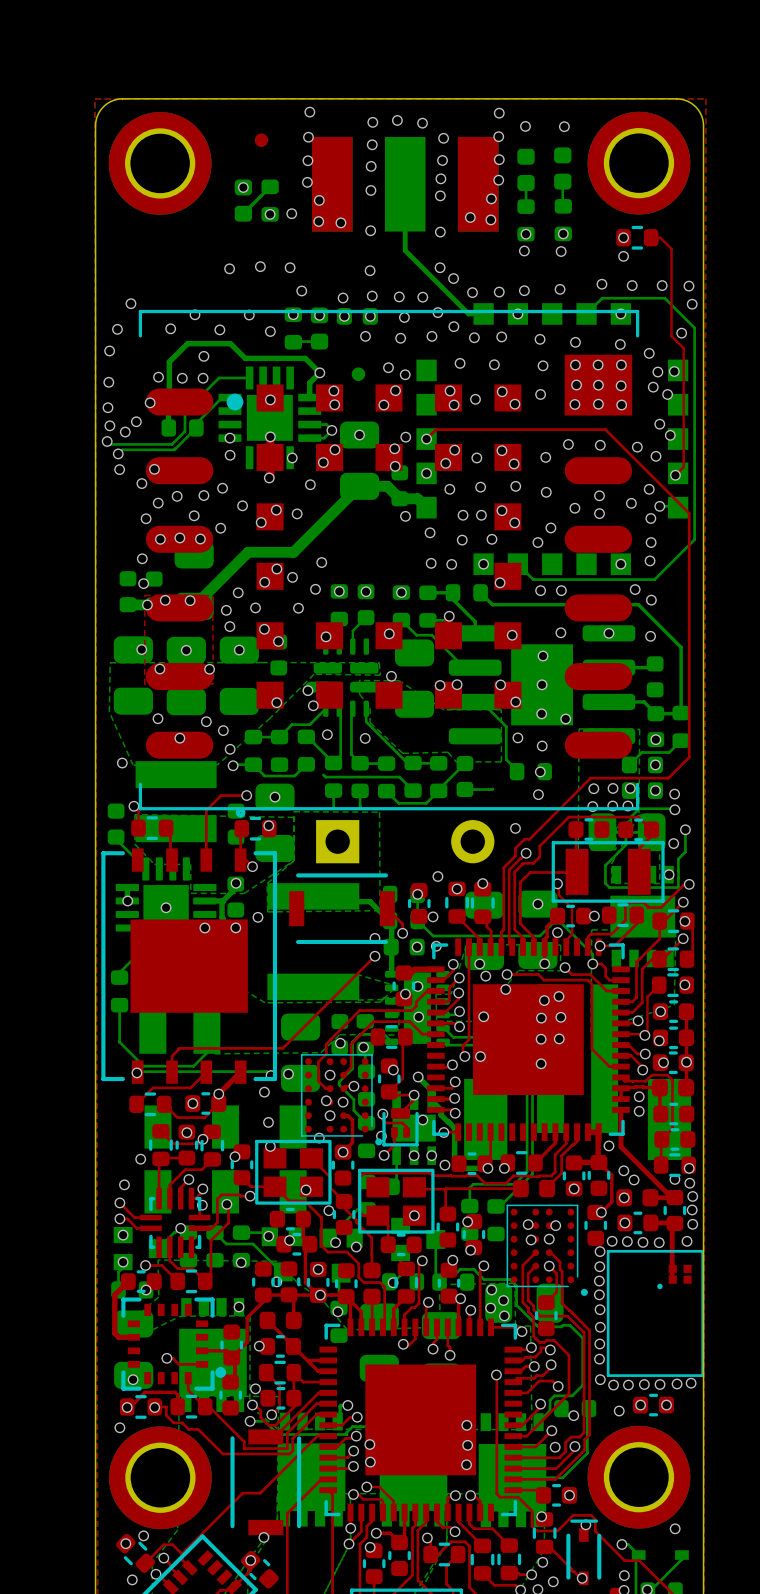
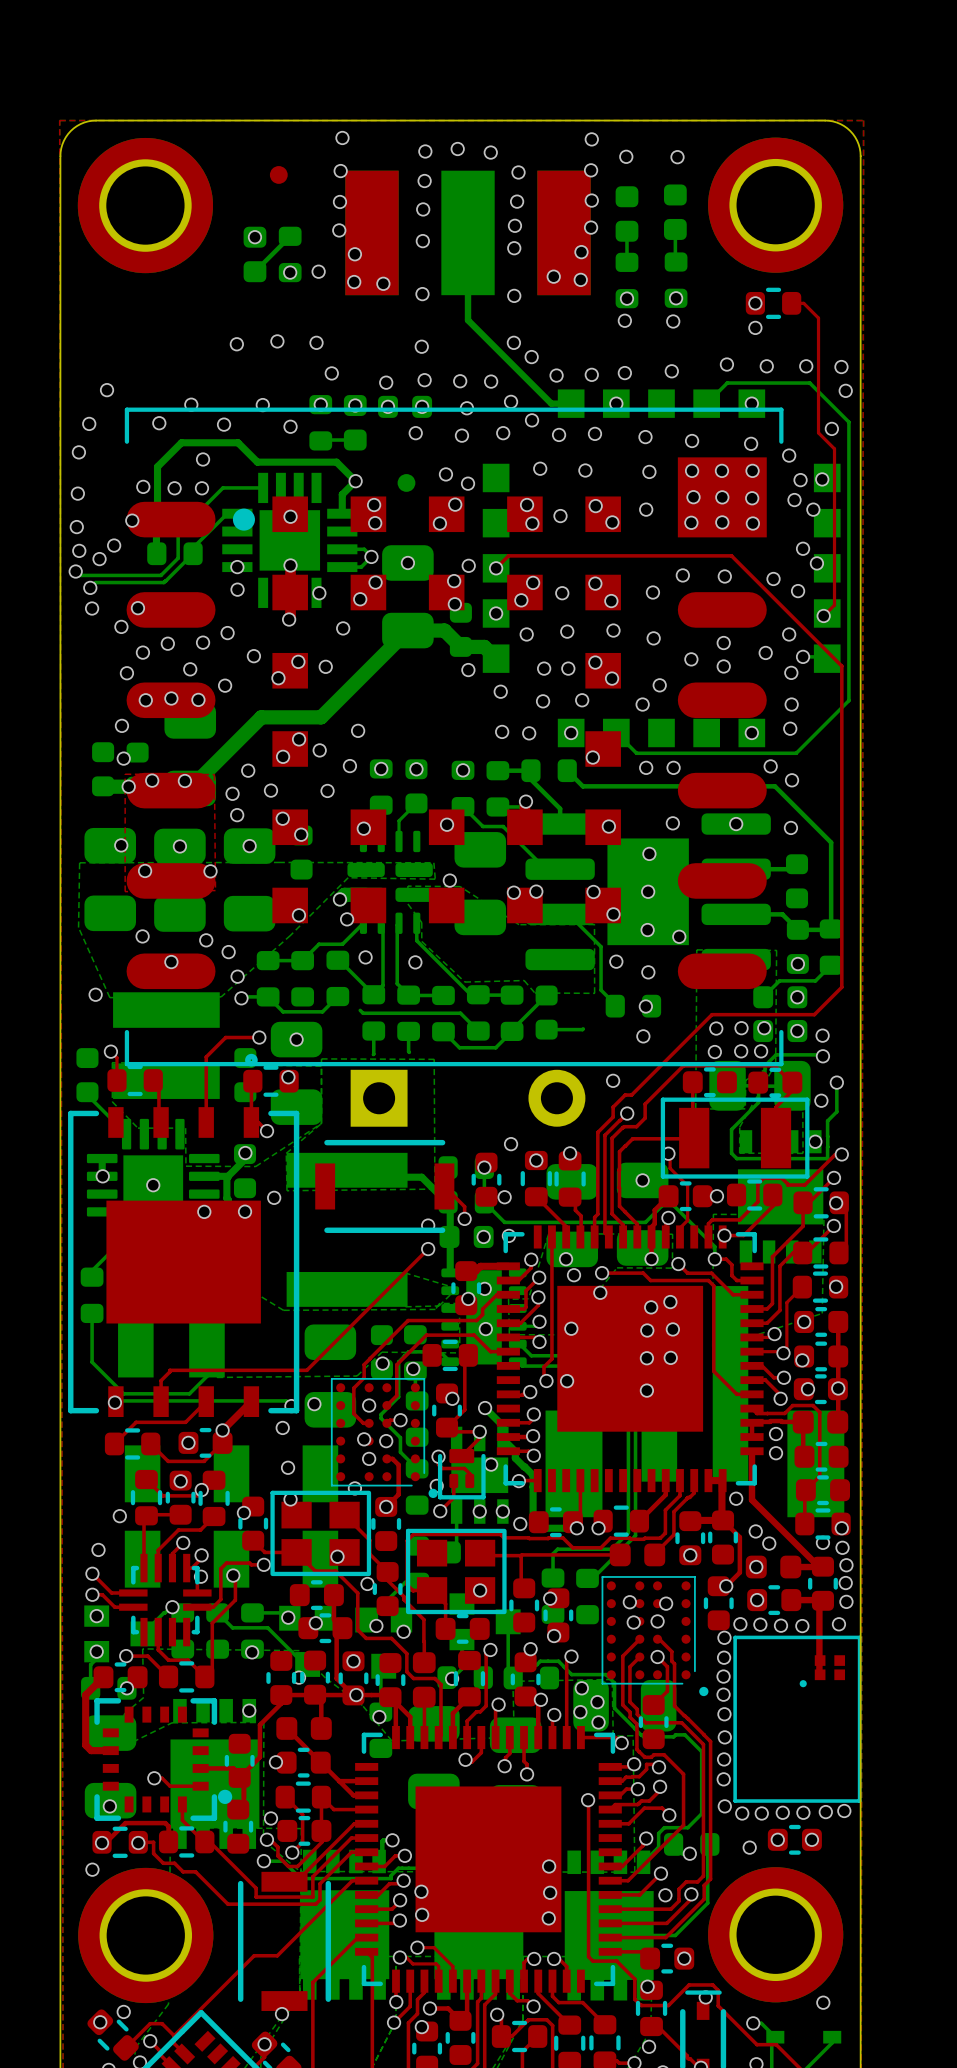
part footprint: [138, 309, 640, 811] -> [124, 407, 784, 1067]

